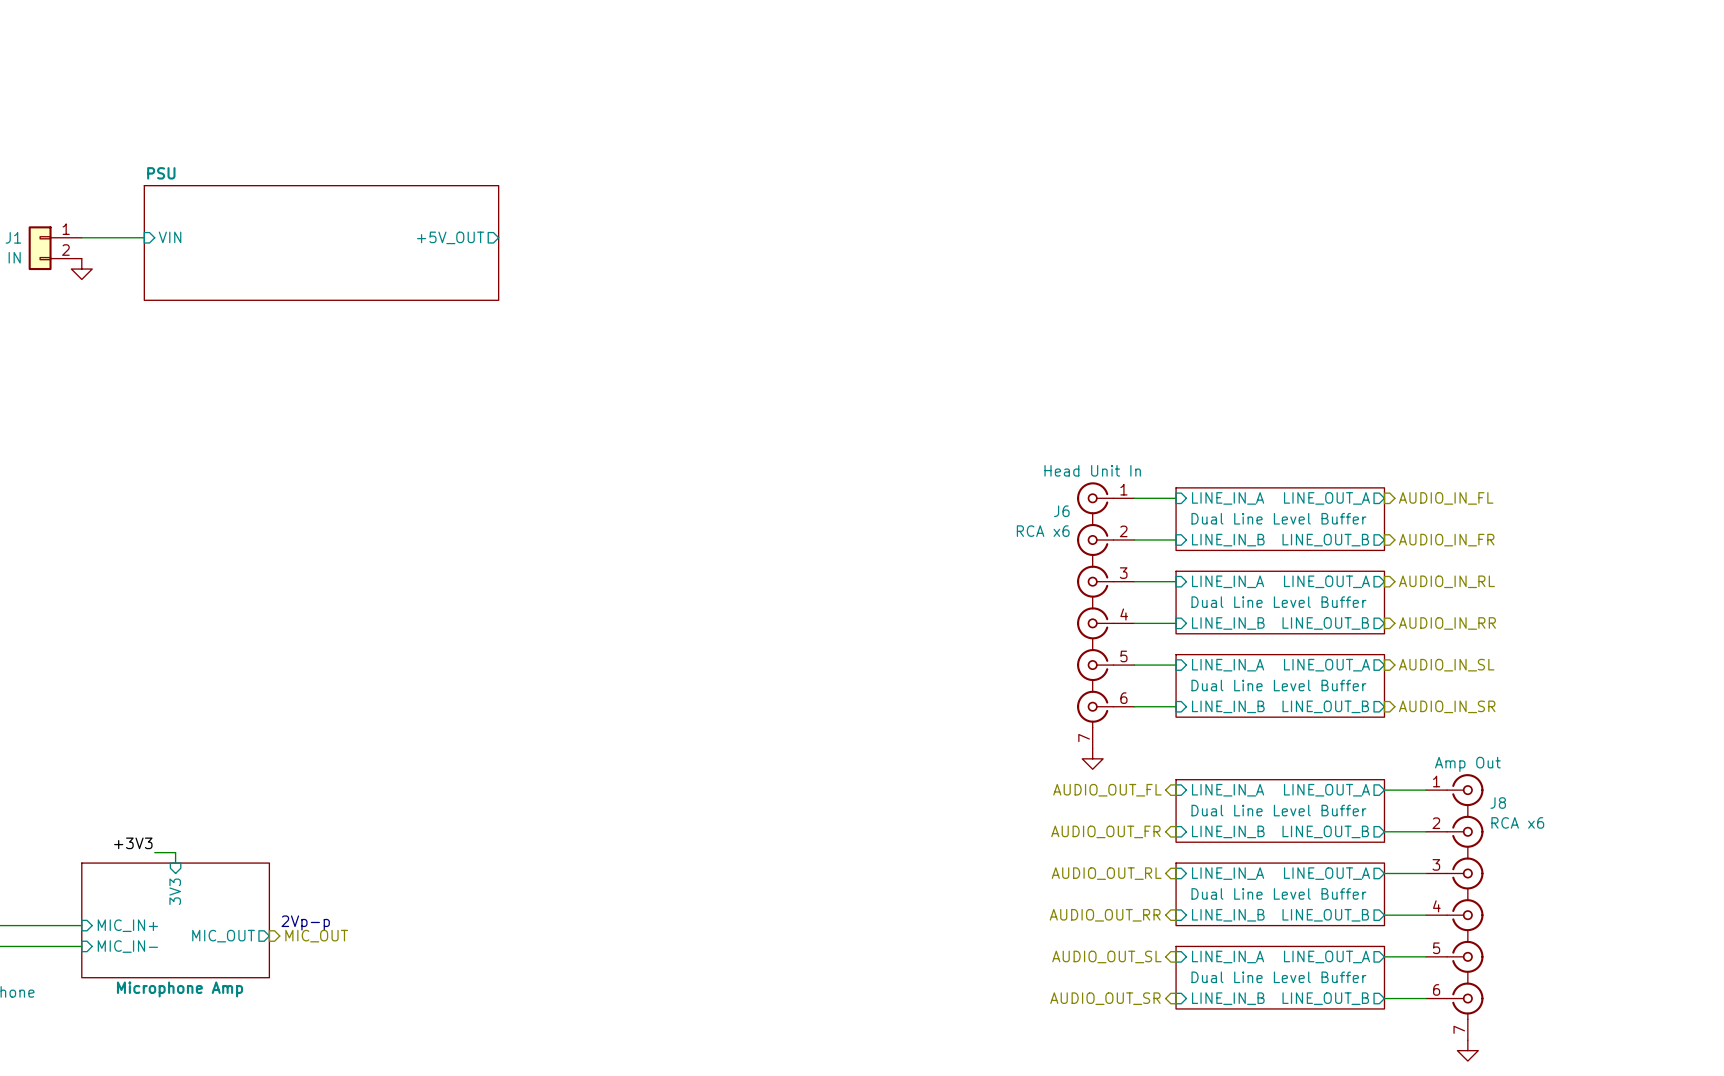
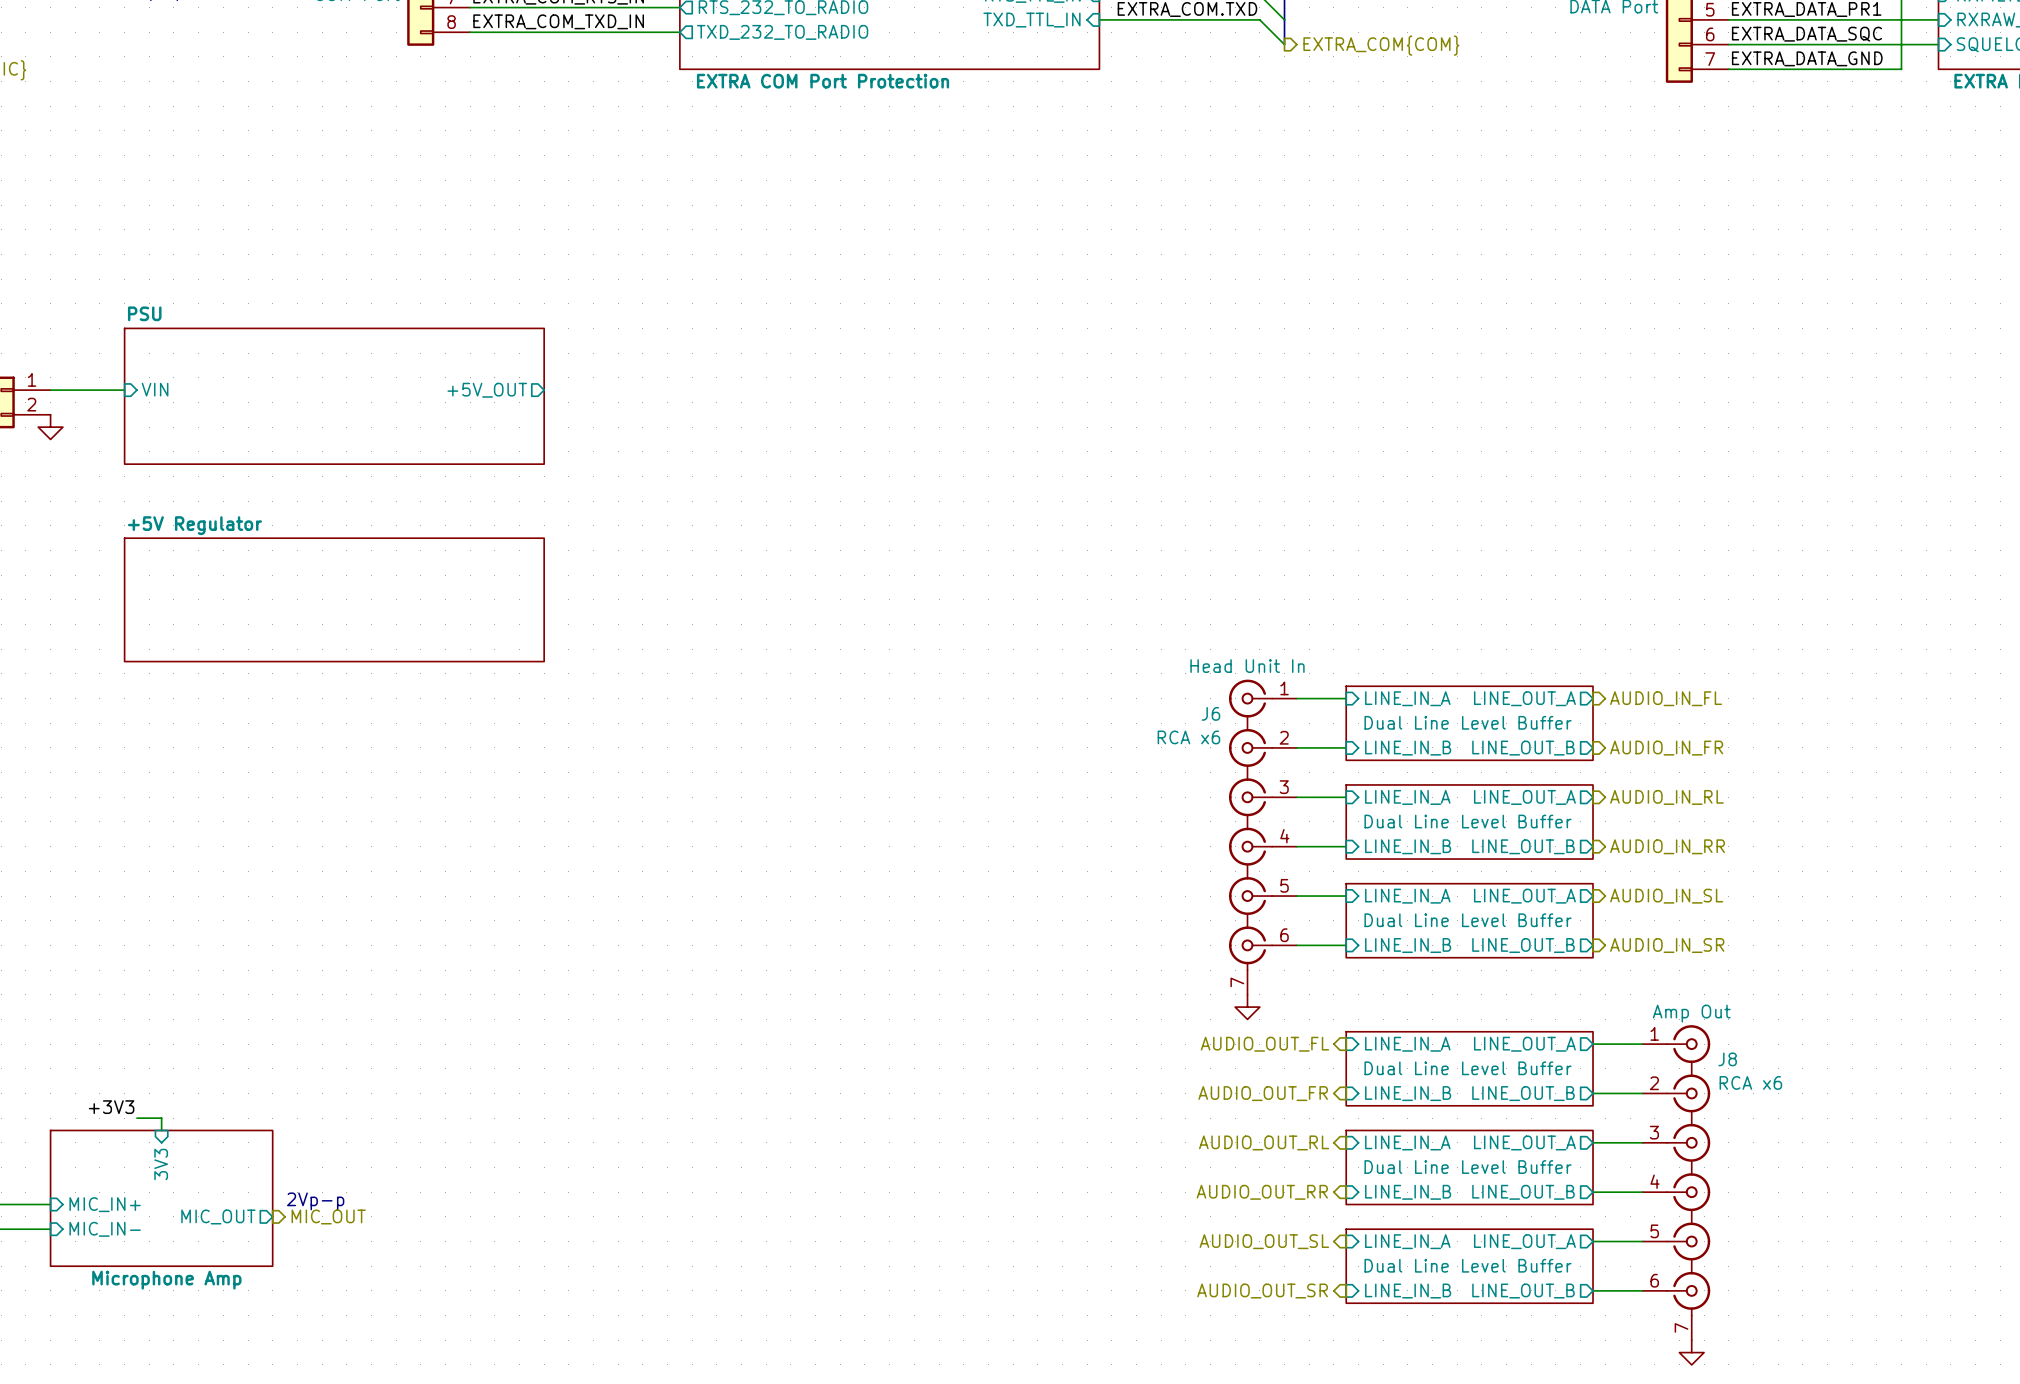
sheet +5V Regulator: none -> (334, 599)

